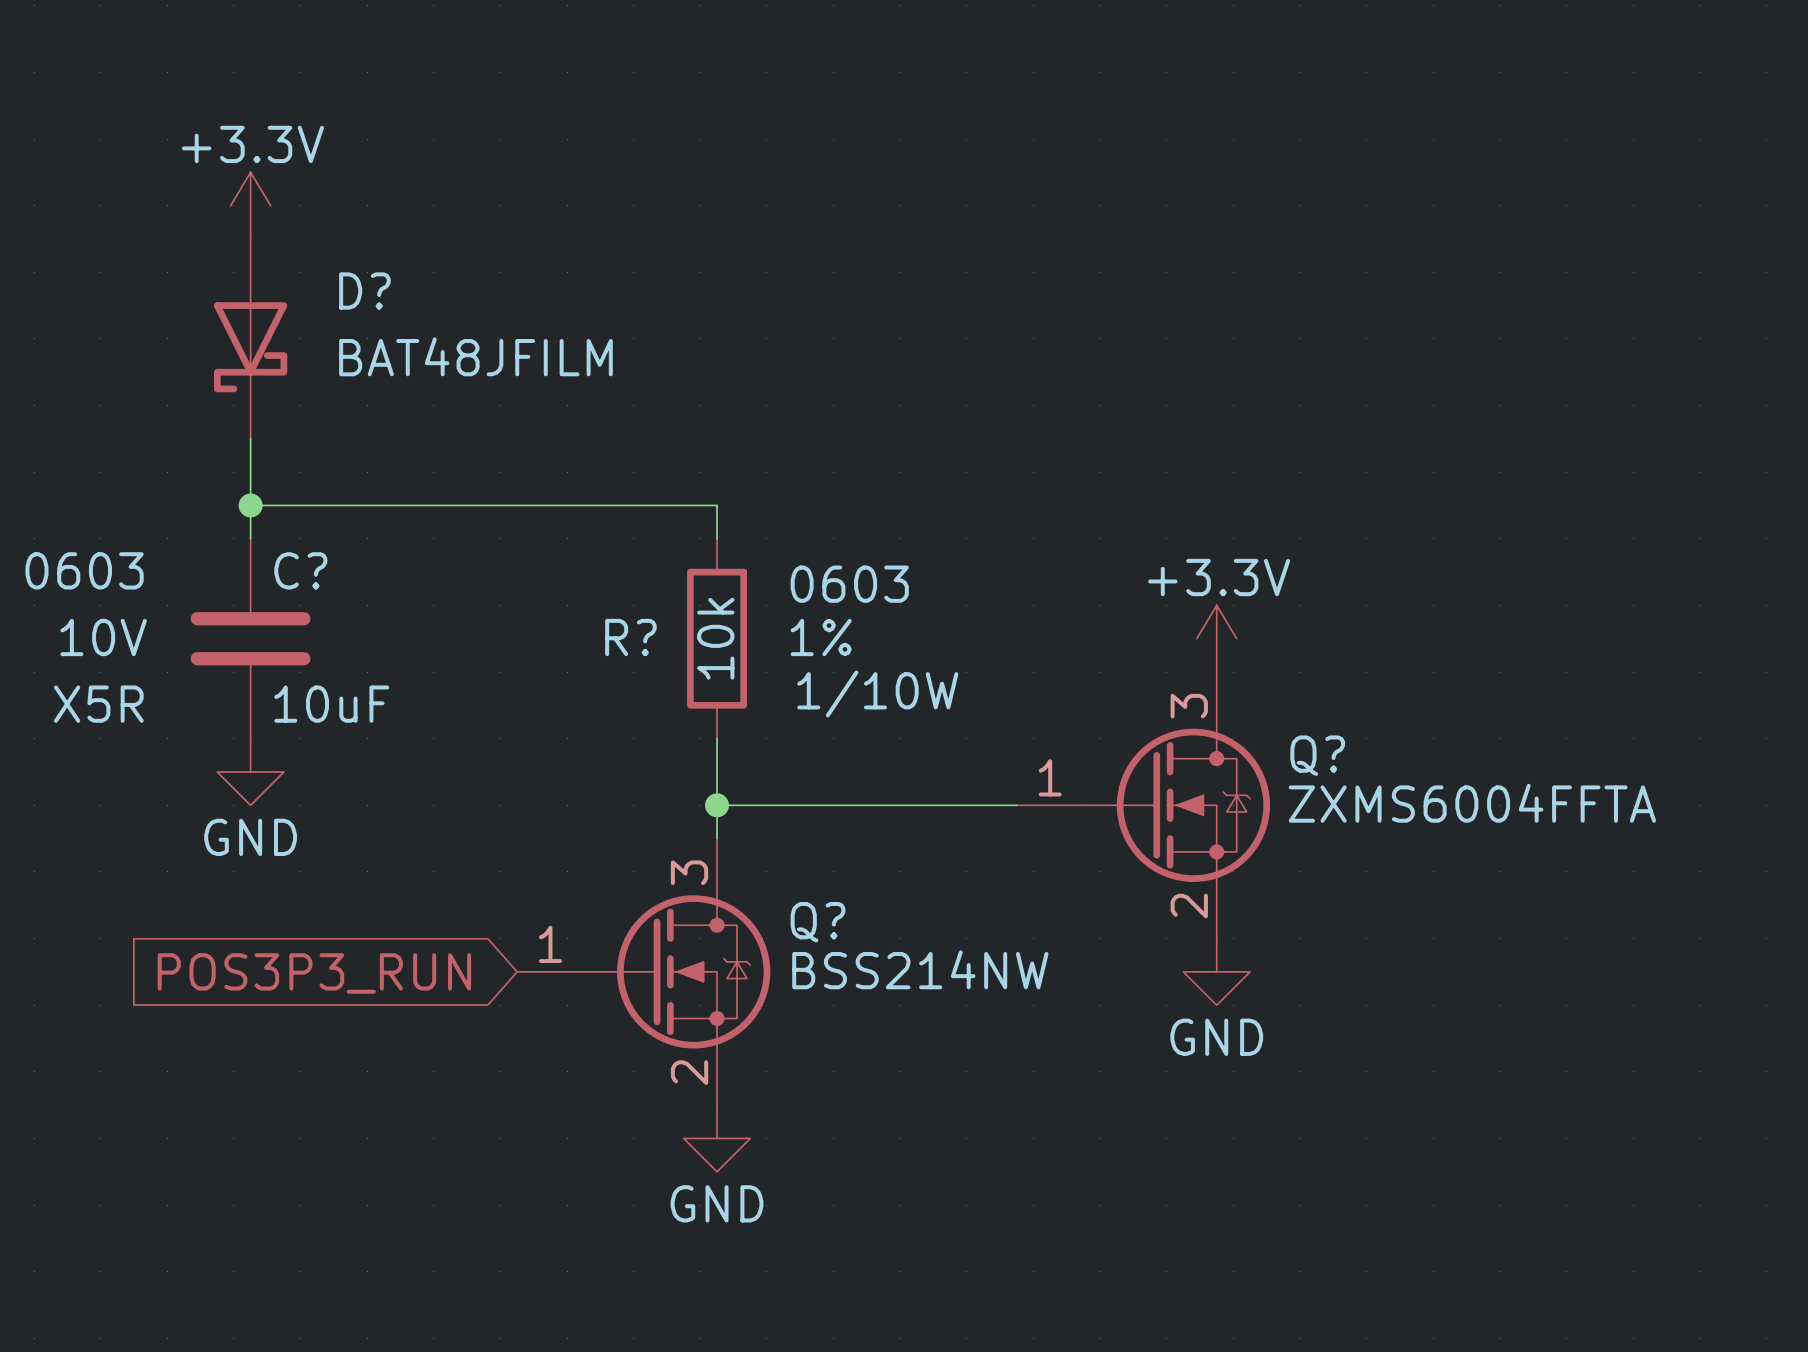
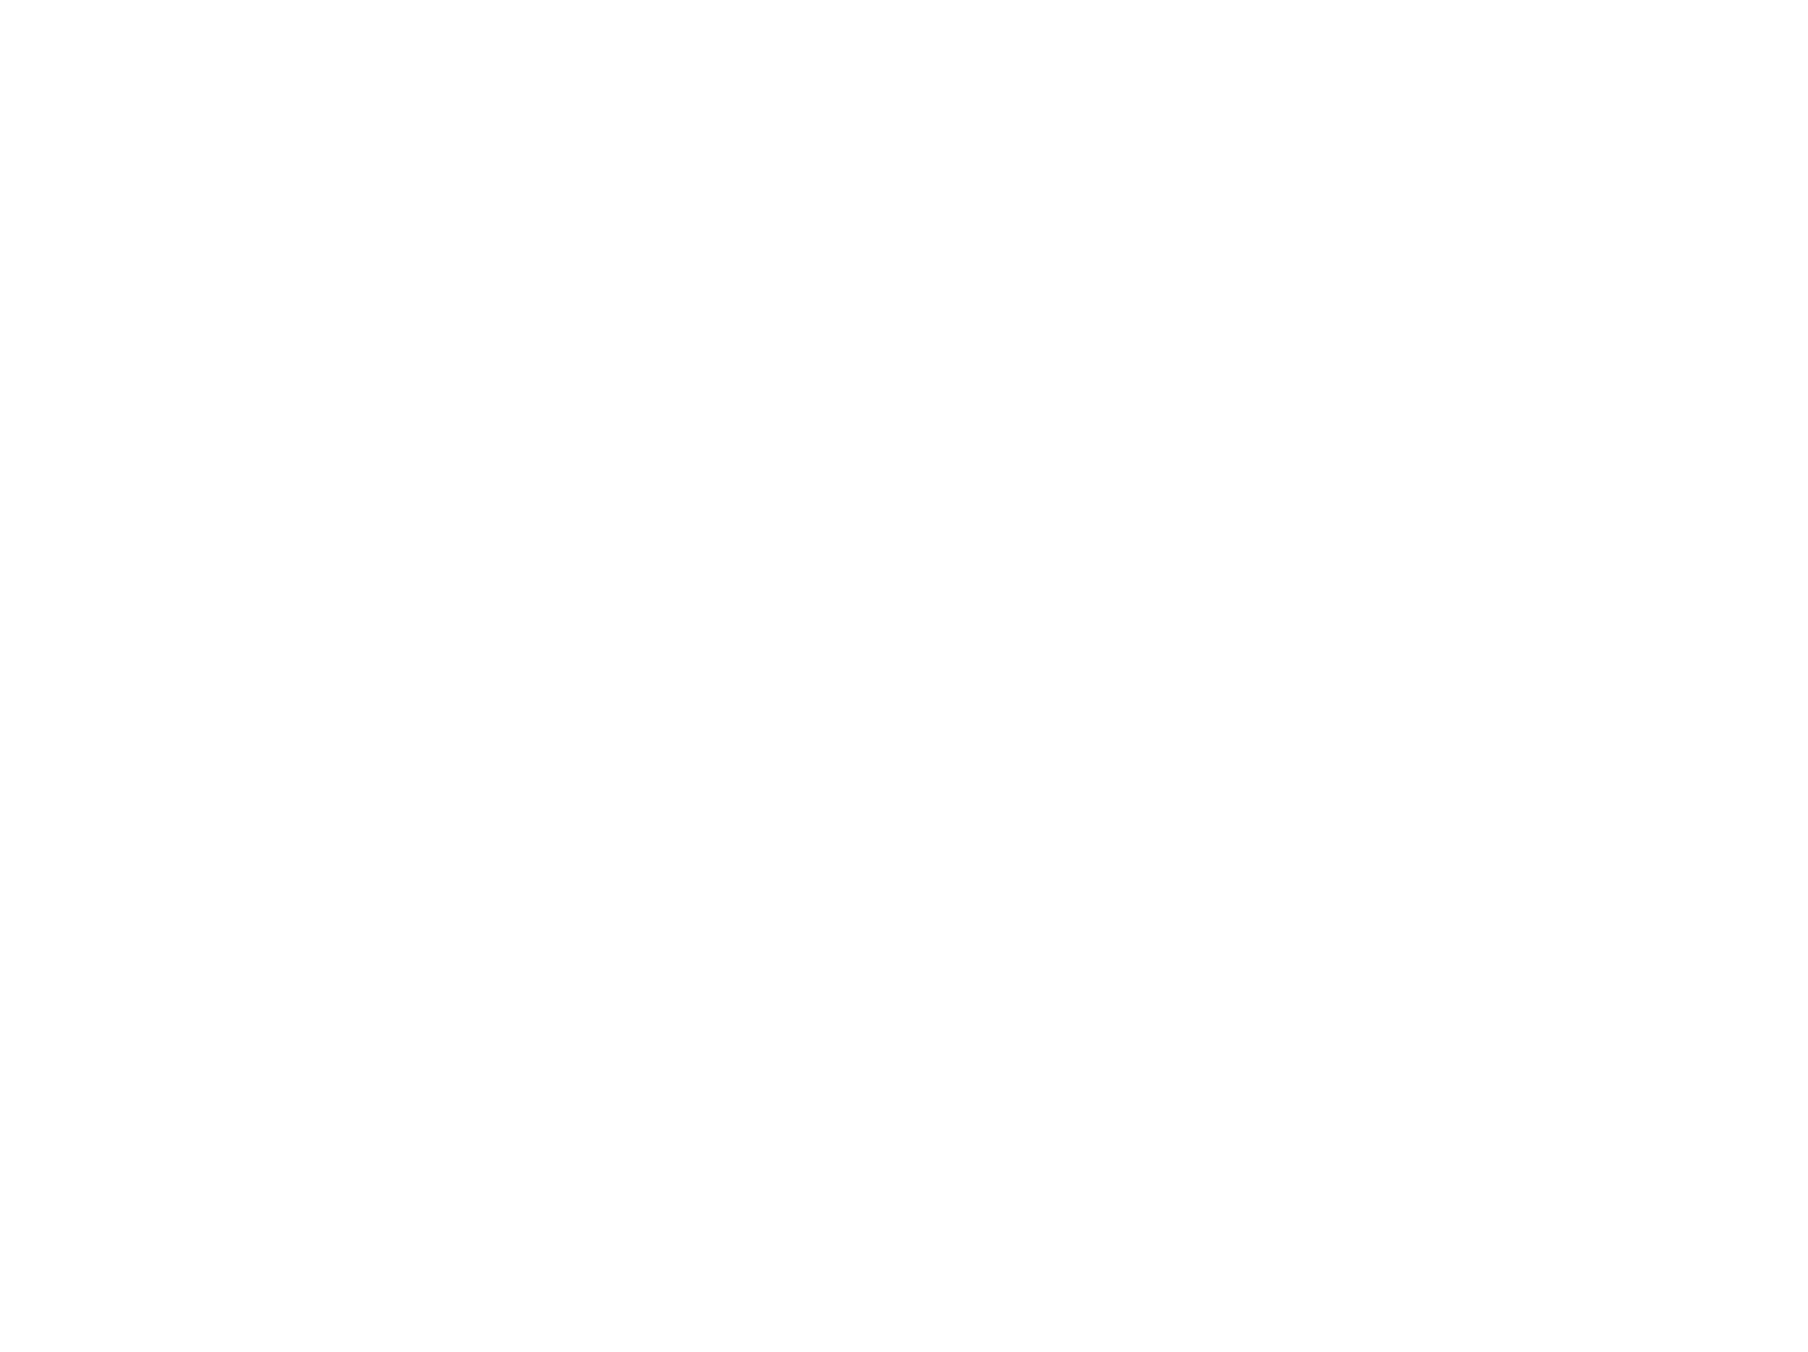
power symbol: +3.3V (250, 205) -> none
D?: BAT48JFILM (250, 338) -> none
wire: (250, 438) (250, 538) -> none
wire: (250, 505) (717, 505) (717, 538) -> none
junction: (250, 505) -> none
C?: 10uF (250, 638) -> none
R?: 10k (717, 638) -> none
power symbol: +3.3V (1216, 638) -> none
wire: (717, 738) (717, 838) -> none
power symbol: GND (250, 771) -> none
wire: (717, 805) (1016, 805) -> none
junction: (717, 805) -> none
Q?: ZXMS6004FFTA (1143, 805) -> none
Q?: BSS214NW (643, 971) -> none
power symbol: GND (1216, 971) -> none
global label: POS3P3_RUN (314, 973) -> none
power symbol: GND (717, 1138) -> none

